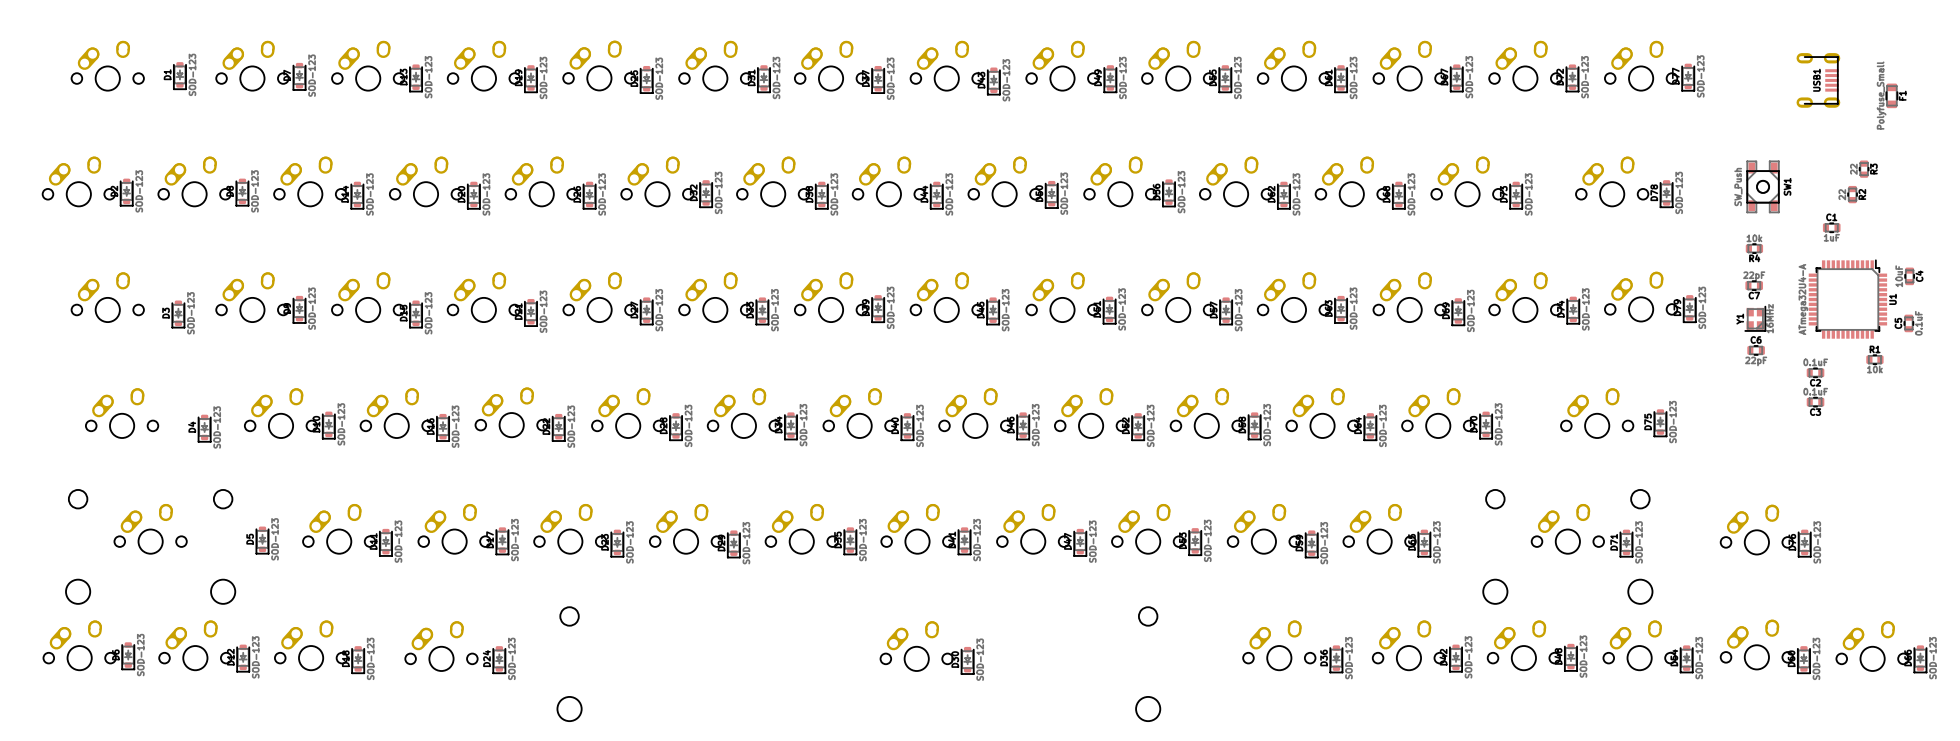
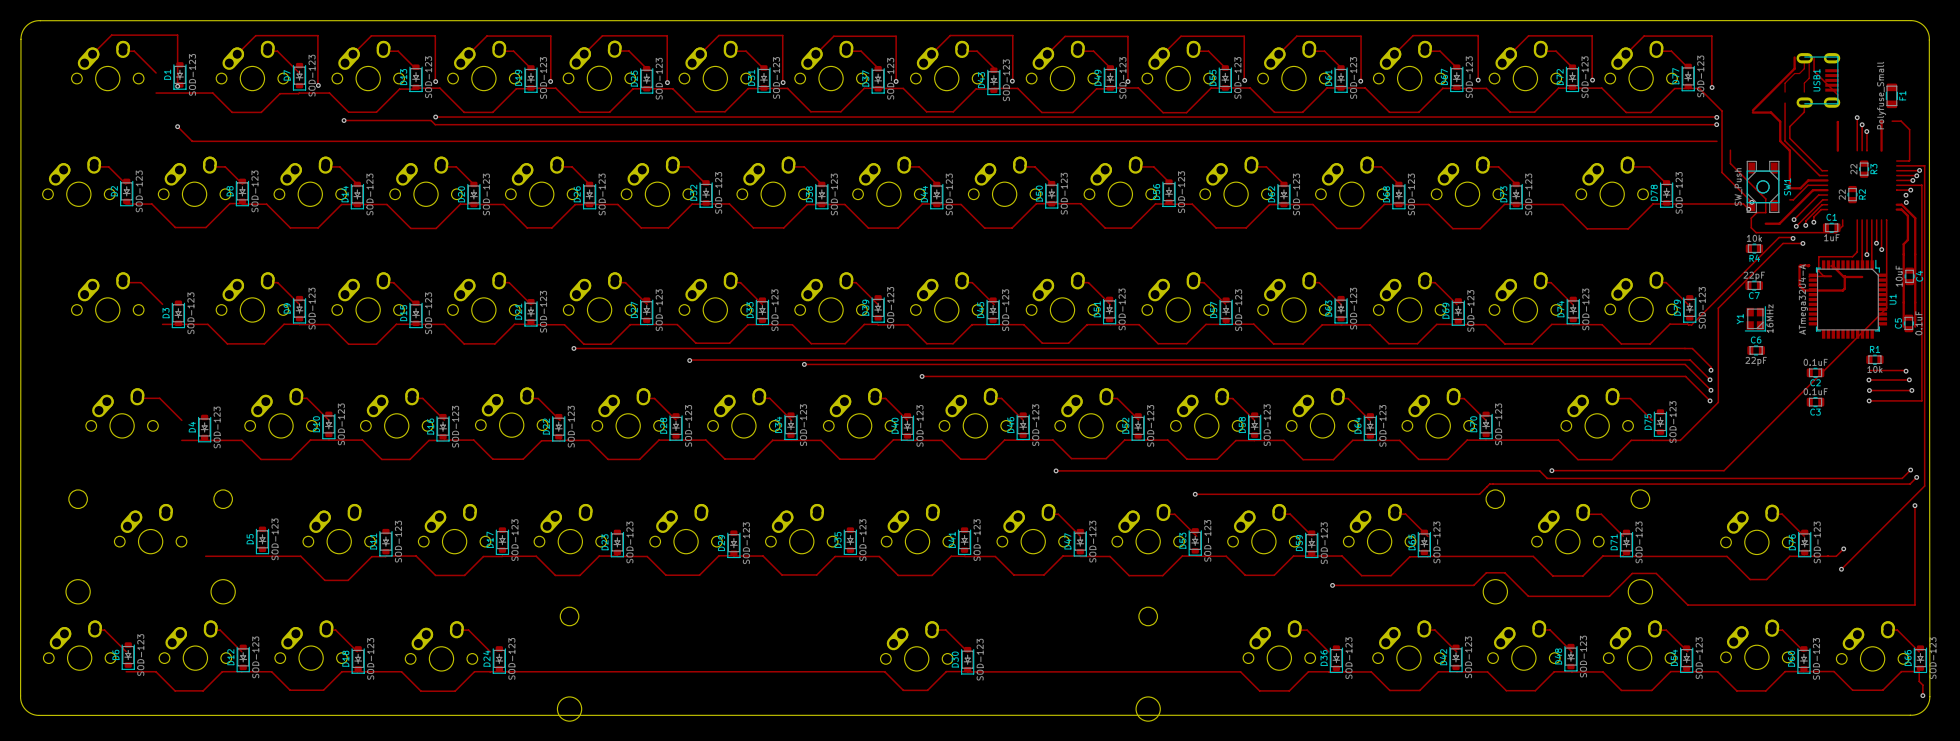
board edge: none -> (1910, 20) (34, 21) (23, 29) (20, 39) (21, 702) (28, 712) (39, 715) (1916, 714) (1926, 706) (1929, 696) (1929, 37) (1924, 26) (1910, 20)
track: none -> (123, 47) (122, 51) (134, 51) (156, 72)
track: none -> (267, 51) (277, 51) (299, 73)
track: none -> (383, 51) (398, 51) (415, 68)
track: none -> (499, 51) (513, 51) (530, 68)
track: none -> (614, 51) (628, 51) (646, 68)
track: none -> (730, 51) (746, 51) (763, 68)
track: none -> (846, 51) (861, 51) (878, 68)
track: none -> (961, 51) (977, 51) (994, 68)
track: none -> (1077, 51) (1093, 51) (1110, 67)
track: none -> (1193, 51) (1208, 51) (1225, 67)
track: none -> (1309, 51) (1324, 51) (1341, 67)
track: none -> (1424, 51) (1440, 51) (1457, 68)
track: none -> (1540, 51) (1556, 51) (1572, 68)
track: none -> (1656, 51) (1671, 51) (1688, 68)
track: none -> (92, 54) (111, 35) (177, 35) (177, 86)
track: none -> (237, 54) (255, 35) (317, 35) (318, 85)
track: none -> (353, 54) (371, 35) (435, 35) (435, 81)
track: none -> (468, 54) (486, 36) (550, 36) (550, 81)
track: none -> (584, 54) (602, 35) (667, 35) (667, 82)
track: none -> (700, 54) (718, 35) (782, 35) (783, 82)
track: none -> (815, 54) (833, 36) (896, 36) (896, 81)
track: none -> (931, 54) (950, 35) (1012, 35) (1012, 81)
track: none -> (1047, 54) (1065, 36) (1127, 36) (1127, 81)
track: none -> (1163, 54) (1180, 36) (1244, 36) (1244, 80)
track: none -> (1278, 54) (1296, 36) (1361, 36) (1360, 81)
track: none -> (1394, 54) (1413, 35) (1478, 35) (1478, 80)
track: none -> (1510, 54) (1528, 35) (1592, 35) (1592, 80)
track: none -> (1625, 54) (1644, 36) (1711, 36) (1712, 87)
track: none -> (1794, 57) (1794, 68) (1752, 110)
track: none -> (1804, 57) (1804, 68) (1799, 73) (1794, 73) (1785, 83) (1785, 92)
track: none -> (1809, 57) (1809, 78) (1804, 83) (1804, 92)
track: none -> (1814, 57) (1814, 71) (1837, 94) (1837, 104)
via: none -> (1244, 80)
via: none -> (1478, 80)
via: none -> (1592, 80)
via: none -> (435, 81)
via: none -> (550, 81)
via: none -> (896, 81)
via: none -> (1012, 81)
via: none -> (1127, 81)
via: none -> (1360, 81)
via: none -> (667, 82)
via: none -> (783, 82)
via: none -> (318, 85)
via: none -> (177, 86)
via: none -> (1712, 87)
track: none -> (646, 88) (633, 88) (609, 112) (579, 112) (555, 88) (516, 88) (492, 112) (464, 112) (439, 88) (399, 89) (376, 112) (348, 112) (329, 93) (280, 93) (261, 112) (232, 112) (212, 93) (156, 93)
track: none -> (1442, 88) (1418, 112) (1389, 112) (1365, 87) (1326, 87) (1302, 112) (1274, 112) (1250, 87) (1211, 88) (1186, 112) (1163, 112) (1138, 87) (1096, 88) (1072, 112) (1041, 112) (1017, 88) (975, 89) (953, 111) (926, 111) (903, 88) (864, 88) (840, 111) (810, 111) (787, 88) (748, 88) (725, 111) (695, 111) (672, 88) (646, 88)
track: none -> (1572, 88) (1601, 88) (1626, 112) (1650, 112) (1674, 88) (1699, 88) (1722, 111) (1722, 172) (1751, 202)
track: none -> (1572, 88) (1558, 88) (1534, 112) (1510, 112) (1486, 88) (1442, 88)
track: none -> (1785, 103) (1785, 141) (1819, 175) (1827, 175)
track: none -> (1804, 103) (1804, 112) (1789, 126) (1789, 138) (1822, 170) (1827, 170)
track: none -> (1752, 112) (1771, 112) (1780, 121) (1780, 141) (1789, 150) (1789, 188) (1800, 188) (1808, 180) (1827, 180)
track: none -> (435, 117) (1716, 117)
via: none -> (435, 117)
via: none -> (1716, 117)
track: none -> (1857, 117) (1857, 150)
via: none -> (1857, 117)
track: none -> (344, 120) (431, 120) (435, 124) (1716, 124)
via: none -> (344, 120)
track: none -> (1881, 121) (1881, 150)
track: none -> (1892, 121) (1901, 121) (1909, 129) (1909, 160) (1896, 161)
track: none -> (1837, 122) (1837, 150)
via: none -> (1716, 124)
track: none -> (1862, 124) (1862, 150)
via: none -> (1862, 124)
track: none -> (177, 126) (192, 141) (1716, 141)
via: none -> (177, 126)
track: none -> (1866, 131) (1866, 150)
via: none -> (1866, 131)
track: none -> (1730, 150) (1730, 163) (1765, 198) (1765, 212) (1756, 212) (1751, 218) (1751, 227) (1756, 232) (1836, 232) (1842, 226) (1842, 219)
track: none -> (1896, 165) (1924, 165) (1924, 486) (1841, 569)
track: none -> (94, 166) (108, 166) (125, 184)
track: none -> (209, 166) (225, 166) (242, 184)
track: none -> (325, 166) (339, 166) (357, 184)
track: none -> (441, 166) (456, 166) (473, 184)
track: none -> (556, 166) (572, 166) (589, 184)
track: none -> (672, 166) (688, 166) (705, 183)
track: none -> (788, 166) (804, 166) (821, 184)
track: none -> (904, 166) (919, 166) (936, 184)
track: none -> (1019, 166) (1035, 166) (1051, 183)
track: none -> (1135, 166) (1153, 166) (1169, 182)
track: none -> (1251, 166) (1266, 166) (1283, 184)
track: none -> (1366, 166) (1381, 166) (1398, 184)
track: none -> (1482, 166) (1498, 166) (1516, 184)
track: none -> (1627, 166) (1649, 166) (1666, 183)
track: none -> (1919, 170) (1896, 170)
via: none -> (1919, 170)
track: none -> (1896, 175) (1916, 175)
via: none -> (1916, 175)
track: none -> (1896, 180) (1912, 180)
via: none -> (1912, 180)
track: none -> (1827, 185) (1807, 185) (1793, 199) (1789, 199)
track: none -> (1896, 185) (1921, 185)
track: none -> (1921, 185) (1921, 400) (1869, 400)
track: none -> (1827, 190) (1813, 190) (1779, 223) (1765, 223)
track: none -> (1896, 190) (1910, 190)
via: none -> (1910, 190)
track: none -> (1827, 195) (1818, 195) (1794, 219)
via: none -> (1906, 195)
track: none -> (1827, 199) (1822, 199) (1796, 226)
via: none -> (1751, 202)
via: none -> (1906, 202)
track: none -> (125, 204) (151, 204) (175, 227) (205, 227) (229, 203) (266, 204) (290, 227) (318, 227) (341, 204) (386, 204) (410, 228) (436, 228) (460, 204) (503, 204) (527, 227) (551, 227) (575, 204) (589, 204)
track: none -> (589, 204) (617, 204) (641, 227) (668, 227) (692, 204) (705, 203) (729, 203) (753, 227) (783, 227) (807, 204) (821, 204)
track: none -> (821, 204) (844, 204) (868, 228) (898, 228) (922, 203) (961, 204) (984, 228) (1012, 228) (1036, 203) (1080, 203) (1105, 228) (1131, 228) (1155, 203) (1192, 204) (1215, 227) (1246, 227) (1269, 204) (1283, 204)
track: none -> (1283, 204) (1312, 204) (1336, 228) (1360, 228) (1384, 204) (1428, 204) (1452, 228) (1480, 228) (1504, 204) (1562, 204) (1587, 228) (1628, 228) (1653, 203) (1743, 203) (1748, 209)
track: none -> (1827, 204) (1822, 204) (1805, 221) (1805, 225)
track: none -> (1896, 204) (1901, 204) (1915, 218) (1915, 326)
via: none -> (1748, 209)
track: none -> (1827, 209) (1821, 209) (1813, 216) (1813, 222)
track: none -> (1896, 209) (1901, 209) (1907, 215) (1907, 239) (1903, 244) (1903, 326)
via: none -> (1794, 219)
track: none -> (1857, 219) (1857, 251) (1852, 256) (1818, 256) (1818, 271) (1823, 276)
track: none -> (1862, 219) (1862, 265)
track: none -> (1866, 219) (1866, 254)
track: none -> (1871, 219) (1872, 268)
track: none -> (1876, 219) (1876, 243)
track: none -> (1881, 219) (1881, 249)
track: none -> (1886, 219) (1886, 308) (1724, 470) (1551, 470)
via: none -> (1813, 222)
via: none -> (1805, 225)
via: none -> (1796, 226)
track: none -> (1793, 238) (1779, 237) (1691, 324) (1669, 324) (1650, 343) (1621, 343) (1602, 324) (1551, 324) (1532, 343) (1504, 343) (1485, 324) (1436, 324) (1417, 343) (1388, 343) (1370, 324) (1341, 324)
via: none -> (1793, 238)
track: none -> (1802, 243) (1783, 243) (1718, 308) (1718, 402) (1680, 440) (1652, 440)
via: none -> (1802, 243)
via: none -> (1876, 243)
via: none -> (1881, 249)
via: none -> (1866, 254)
track: none -> (1808, 266) (1799, 266) (1799, 285) (1804, 290) (1842, 290) (1844, 288) (1844, 276)
track: none -> (1831, 266) (1844, 276)
track: none -> (1831, 276) (1809, 276)
track: none -> (1844, 276) (1862, 276)
track: none -> (122, 282) (140, 282) (162, 304)
track: none -> (267, 282) (277, 282) (299, 304)
track: none -> (383, 282) (393, 282) (415, 304)
track: none -> (499, 282) (509, 282) (531, 304)
track: none -> (614, 282) (625, 282) (647, 304)
track: none -> (730, 282) (740, 282) (762, 304)
track: none -> (846, 282) (856, 282) (878, 304)
track: none -> (961, 282) (972, 282) (994, 304)
track: none -> (1077, 282) (1088, 282) (1110, 304)
track: none -> (1193, 282) (1204, 282) (1225, 304)
track: none -> (1309, 282) (1319, 282) (1341, 304)
track: none -> (1424, 282) (1435, 282) (1457, 304)
track: none -> (1540, 282) (1551, 282) (1572, 304)
track: none -> (1656, 282) (1666, 282) (1688, 304)
track: none -> (415, 324) (396, 324) (376, 344) (348, 344) (328, 324) (284, 324) (264, 343) (227, 343) (207, 324) (162, 324)
track: none -> (415, 324) (444, 324) (464, 343) (494, 343) (514, 324) (564, 324) (583, 344) (610, 344) (630, 324) (647, 324)
track: none -> (647, 324) (677, 324) (695, 343) (729, 343) (748, 324) (792, 324) (811, 343) (845, 343) (864, 324) (908, 324) (926, 343) (953, 343) (972, 324)
track: none -> (1087, 324) (1068, 343) (1042, 343) (1023, 324) (972, 324)
track: none -> (1087, 324) (1139, 324) (1158, 343) (1186, 343) (1205, 324) (1253, 324) (1273, 343) (1303, 343) (1322, 324) (1341, 324)
track: none -> (573, 348) (1684, 348)
via: none -> (573, 348)
track: none -> (1685, 348) (1692, 348) (1711, 367) (1711, 370)
track: none -> (689, 360) (1690, 360) (1710, 379)
via: none -> (689, 360)
track: none -> (804, 364) (1685, 364) (1710, 390)
via: none -> (804, 364)
via: none -> (1711, 370)
track: none -> (1869, 370) (1906, 371)
via: none -> (1906, 371)
track: none -> (922, 376) (1685, 376) (1710, 400)
via: none -> (922, 376)
via: none -> (1710, 379)
track: none -> (1909, 379) (1868, 380)
via: none -> (1909, 379)
via: none -> (1868, 380)
via: none -> (1710, 390)
via: none -> (1869, 390)
track: none -> (1911, 390) (1869, 390)
via: none -> (1911, 390)
track: none -> (137, 398) (159, 398) (181, 420)
track: none -> (296, 398) (306, 398) (328, 420)
track: none -> (412, 398) (422, 398) (444, 420)
track: none -> (527, 398) (538, 398) (560, 420)
track: none -> (643, 398) (654, 398) (676, 420)
track: none -> (759, 398) (769, 398) (791, 420)
track: none -> (875, 398) (885, 398) (907, 420)
track: none -> (991, 398) (1001, 398) (1023, 420)
track: none -> (1106, 398) (1117, 398) (1138, 420)
track: none -> (1222, 398) (1232, 398) (1254, 420)
track: none -> (1337, 398) (1348, 398) (1369, 420)
track: none -> (1453, 398) (1464, 398) (1485, 420)
track: none -> (1612, 398) (1630, 398) (1652, 420)
via: none -> (1710, 400)
via: none -> (1869, 400)
track: none -> (328, 440) (310, 440) (291, 459) (260, 459) (241, 440) (181, 440)
track: none -> (328, 440) (362, 440) (381, 459) (409, 459) (428, 440) (444, 440) (473, 440) (492, 459) (523, 459) (541, 440) (559, 440)
track: none -> (772, 440) (754, 459) (724, 459) (705, 440) (658, 440) (639, 459) (608, 459) (589, 440) (559, 440)
track: none -> (1369, 440) (1352, 440) (1333, 459) (1303, 459) (1283, 440) (1235, 440) (1217, 459) (1186, 459) (1167, 440) (1124, 440) (1106, 458) (1071, 458) (1053, 440) (1004, 440) (985, 459) (960, 459) (941, 440) (893, 439) (874, 459) (839, 459) (821, 440) (772, 440)
track: none -> (1652, 440) (1631, 440) (1611, 459) (1577, 459) (1558, 440) (1467, 440) (1447, 459) (1418, 459) (1399, 440) (1369, 440)
via: none -> (1056, 470)
via: none -> (1551, 470)
track: none -> (1910, 470) (1902, 478) (1547, 478) (1539, 470) (1056, 470)
via: none -> (1910, 470)
track: none -> (1916, 477) (1910, 484) (1489, 484) (1479, 494) (1195, 494)
via: none -> (1916, 477)
via: none -> (1195, 494)
track: none -> (1914, 505) (1914, 605) (1687, 605) (1656, 573) (1632, 573) (1609, 596) (1528, 596) (1504, 572) (1486, 572) (1473, 585) (1332, 585)
via: none -> (1914, 505)
track: none -> (1048, 514) (1058, 514) (1080, 536)
track: none -> (1164, 514) (1174, 514) (1196, 536)
track: none -> (1279, 514) (1290, 514) (1311, 535)
track: none -> (1395, 514) (1405, 514) (1427, 536)
track: none -> (1583, 514) (1601, 514) (1623, 536)
track: none -> (1771, 514) (1782, 514) (1804, 536)
track: none -> (1843, 548) (1836, 556) (1789, 556) (1766, 579) (1750, 579) (1726, 556) (1602, 556) (1582, 575) (1552, 575) (1533, 556) (1409, 556) (1391, 575) (1361, 575) (1342, 556) (1311, 556)
via: none -> (1843, 548)
track: none -> (1311, 556) (1293, 556) (1274, 575) (1245, 575) (1226, 556) (1182, 556) (1162, 575) (1129, 575) (1110, 556) (1062, 556) (1044, 574) (1013, 574) (995, 556) (951, 556) (932, 575) (898, 575) (879, 556) (835, 556) (816, 574) (781, 574) (763, 556) (718, 555) (699, 575) (665, 575) (647, 556) (599, 556) (579, 575) (555, 575) (536, 556) (483, 556) (464, 575) (435, 575) (416, 556) (386, 556) (371, 556) (348, 580) (324, 580) (300, 556) (205, 556)
via: none -> (1841, 569)
via: none -> (1332, 585)
track: none -> (93, 630) (104, 630) (126, 651)
track: none -> (209, 630) (220, 630) (241, 651)
track: none -> (324, 630) (335, 630) (357, 651)
track: none -> (455, 630) (468, 630) (490, 651)
track: none -> (932, 630) (945, 630) (967, 651)
track: none -> (1294, 630) (1307, 630) (1328, 651)
track: none -> (1424, 630) (1434, 630) (1456, 651)
track: none -> (1539, 630) (1550, 630) (1571, 651)
track: none -> (1655, 630) (1666, 630) (1687, 651)
track: none -> (1771, 630) (1782, 630) (1803, 651)
track: none -> (1886, 630) (1897, 630) (1919, 651)
track: none -> (126, 671) (155, 671) (175, 690) (203, 690) (222, 671) (271, 671) (290, 690) (323, 690) (342, 671) (401, 671) (421, 691) (455, 691) (474, 671) (884, 671) (903, 690) (927, 690) (946, 671) (1240, 671) (1259, 690) (1289, 690) (1308, 671) (1371, 671) (1389, 690) (1419, 690) (1438, 671) (1487, 671) (1506, 690) (1535, 690) (1554, 671) (1602, 671) (1621, 690) (1651, 690) (1670, 671) (1717, 671) (1736, 690) (1765, 690) (1785, 671) (1833, 671) (1852, 690) (1882, 690) (1901, 671) (1918, 671) (1919, 681) (1922, 685) (1922, 695)
via: none -> (1922, 695)

